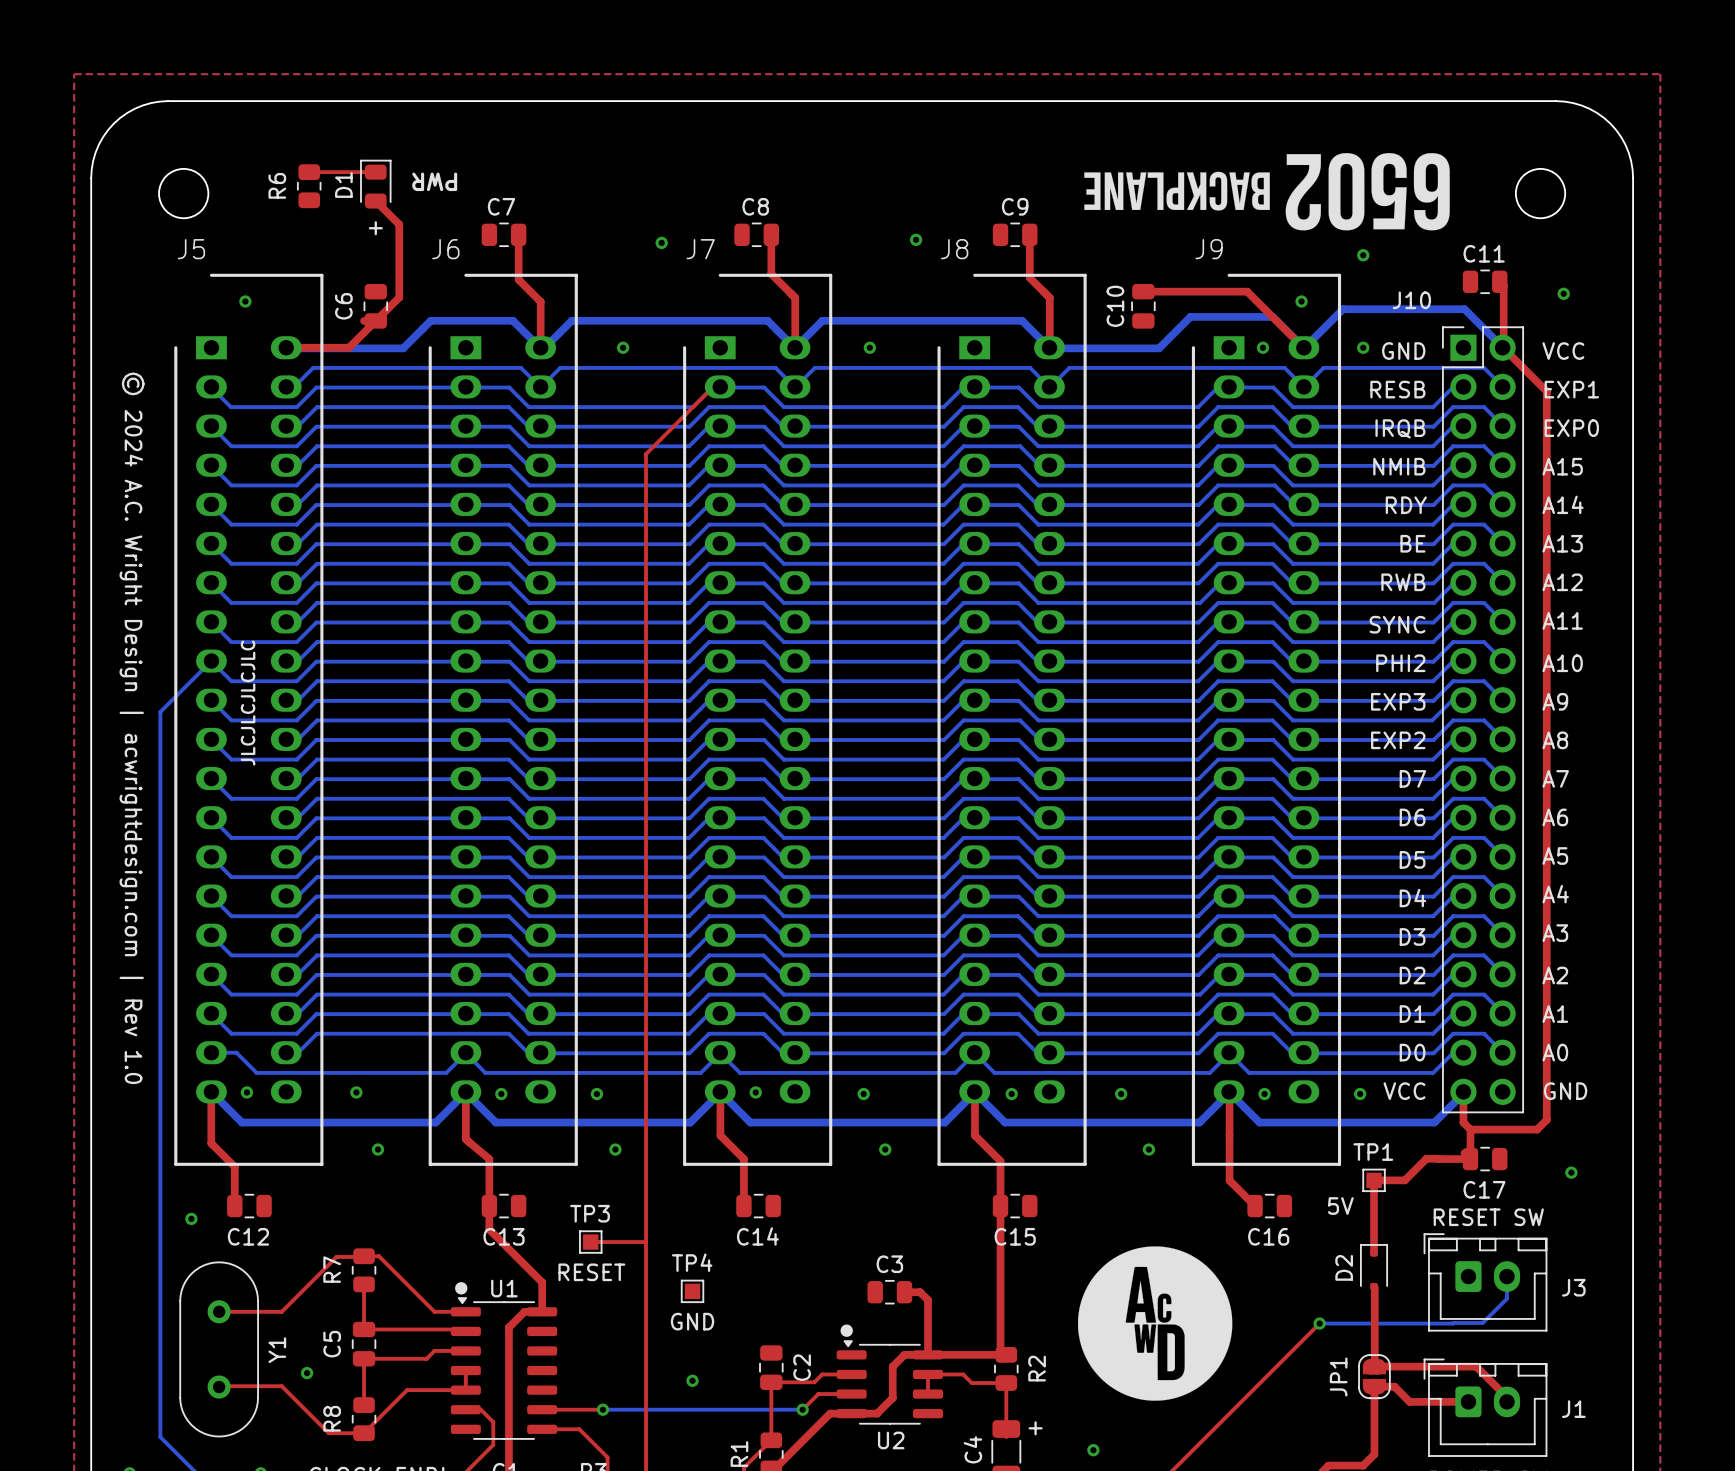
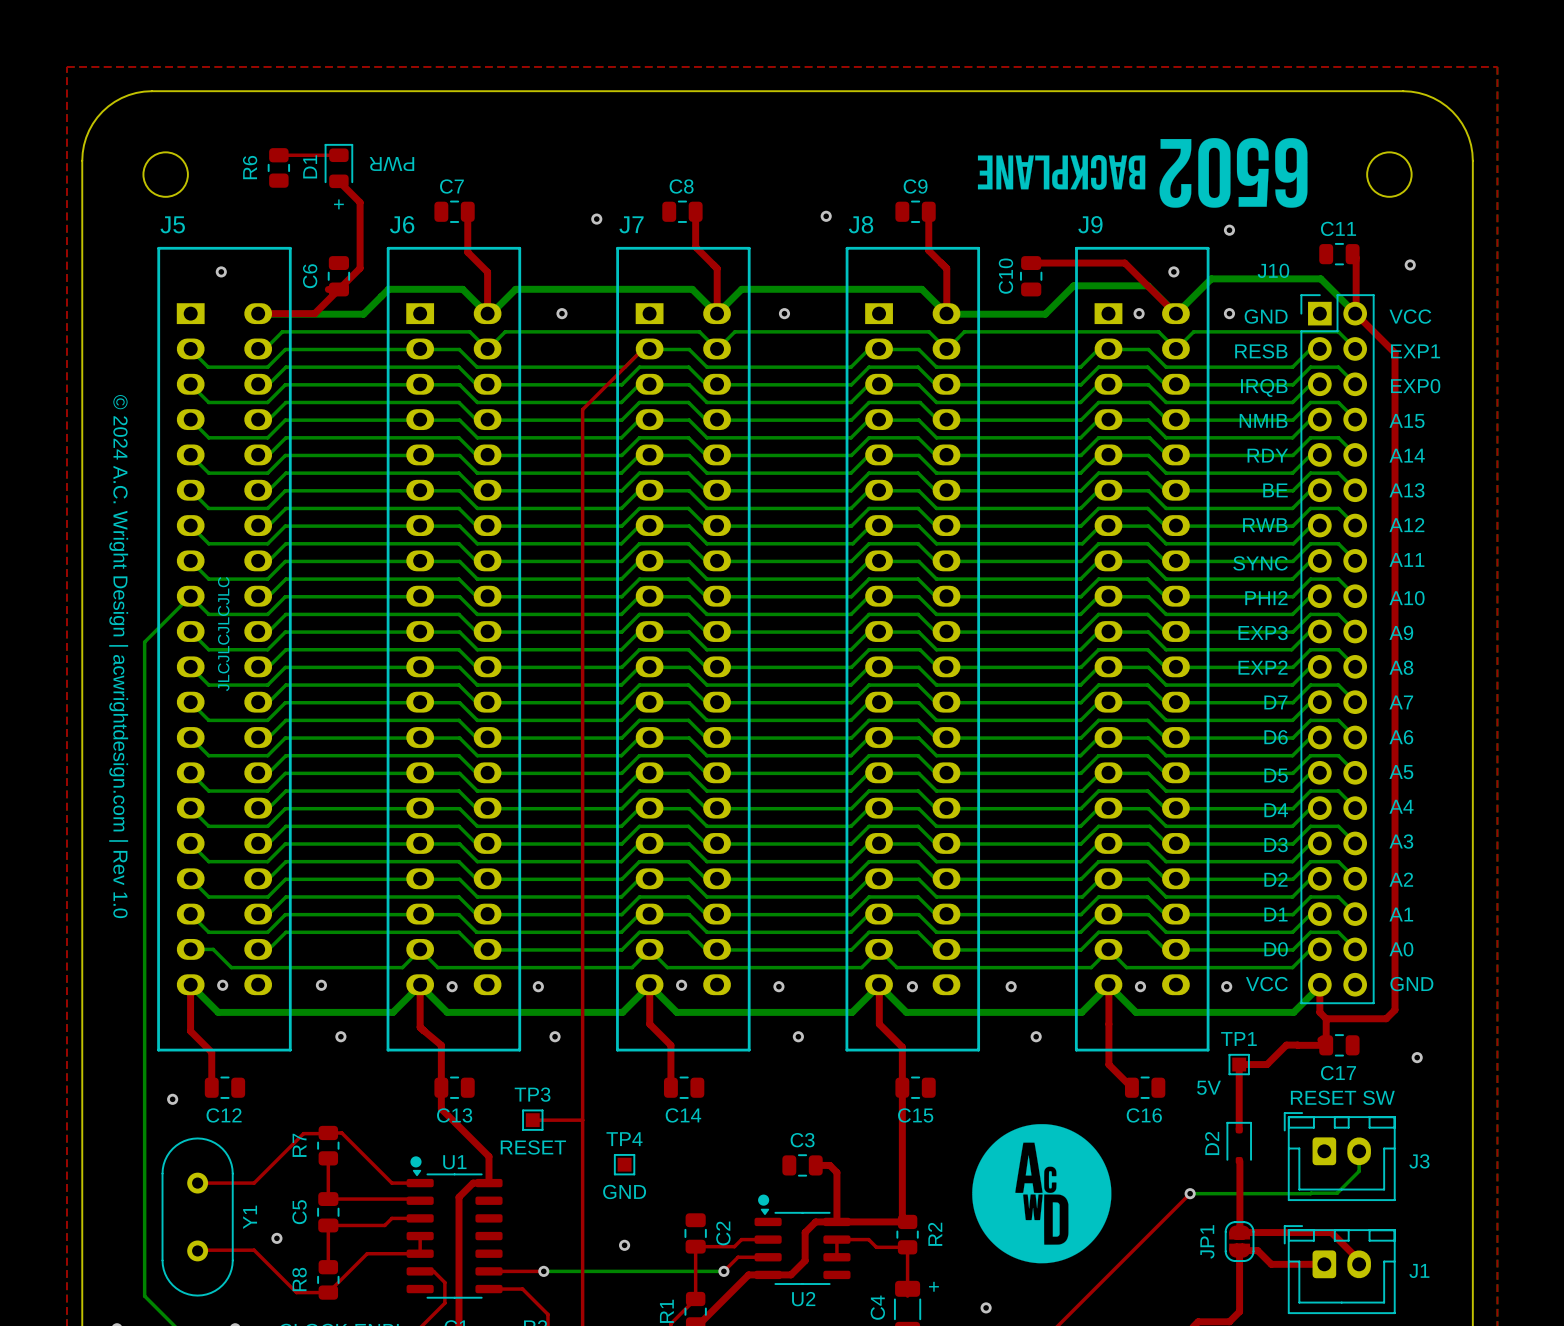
J5 footprint: [174, 273, 324, 1166] -> [157, 246, 292, 1052]
J6 footprint: [428, 273, 578, 1166] -> [386, 246, 522, 1052]
J7 footprint: [683, 273, 833, 1166] -> [616, 246, 751, 1052]
J8 footprint: [937, 273, 1087, 1166] -> [845, 246, 981, 1052]
J9 footprint: [1191, 273, 1342, 1166] -> [1074, 246, 1210, 1052]

